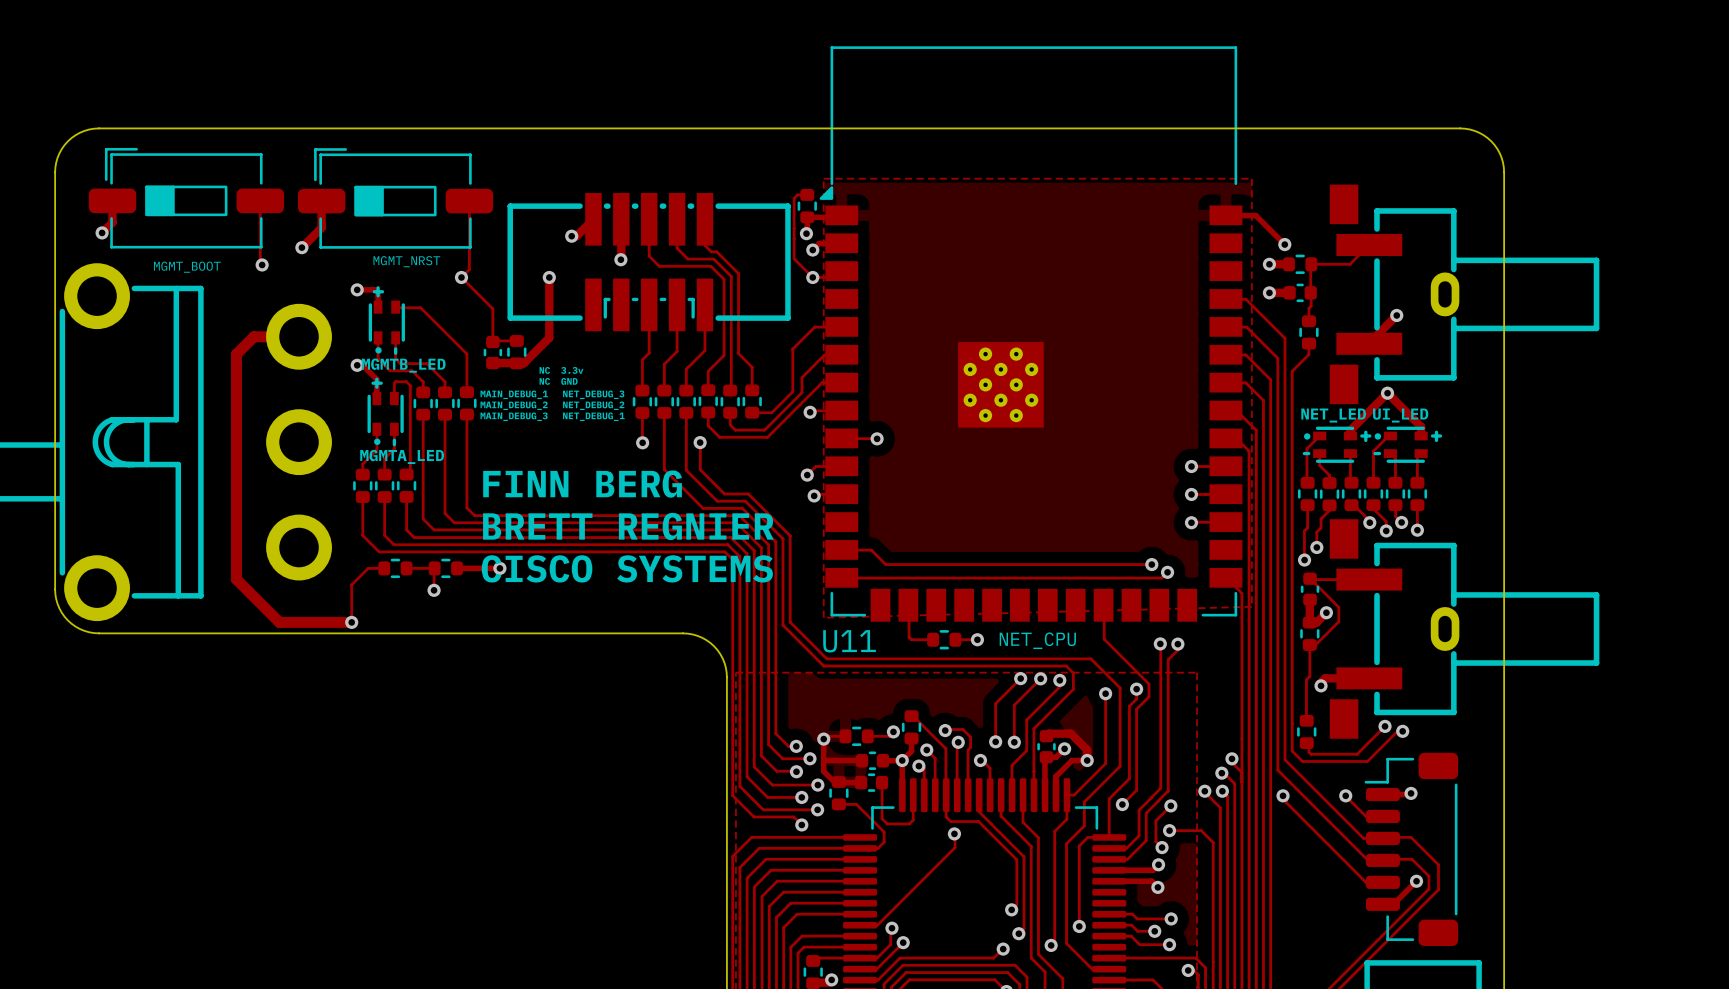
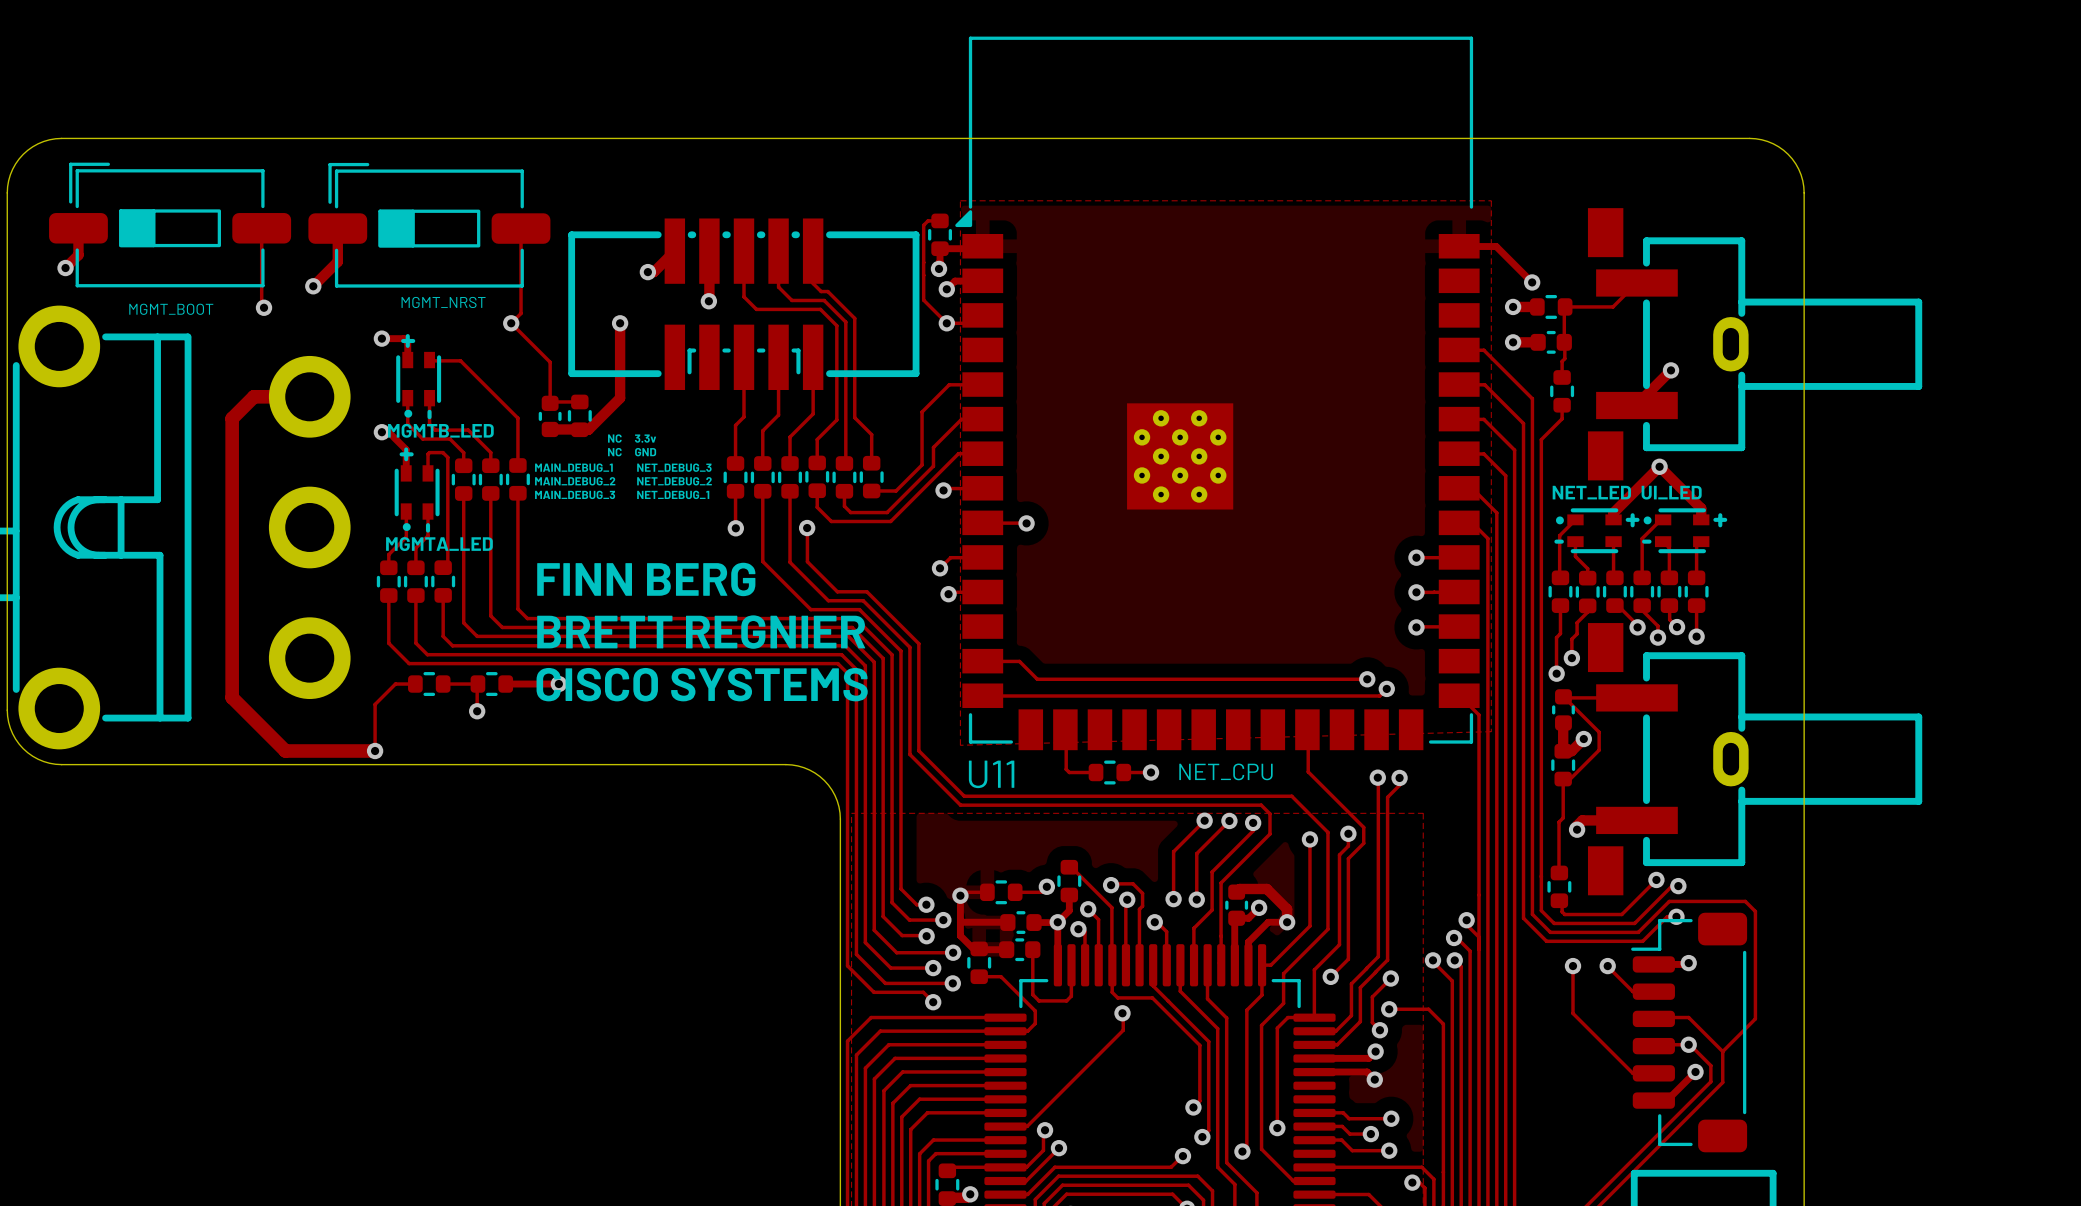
track: (1285, 754) (1285, 759) (1363, 838) (1382, 838) -> (1532, 914) (1550, 932) (1638, 932) (1669, 901) (1745, 901) (1755, 911) (1755, 1018) (1722, 1051)
via: none -> (1676, 916)
track: (1277, 757) (1277, 770) (1368, 860) (1382, 860) -> (1523, 918) (1546, 941) (1642, 941) (1667, 916) (1676, 916)
track: (1283, 795) (1286, 799) (1286, 802) (1317, 834) -> (1573, 966) (1573, 1013)
via position: (1283, 795) -> (1573, 966)
via: none -> (1688, 1044)

